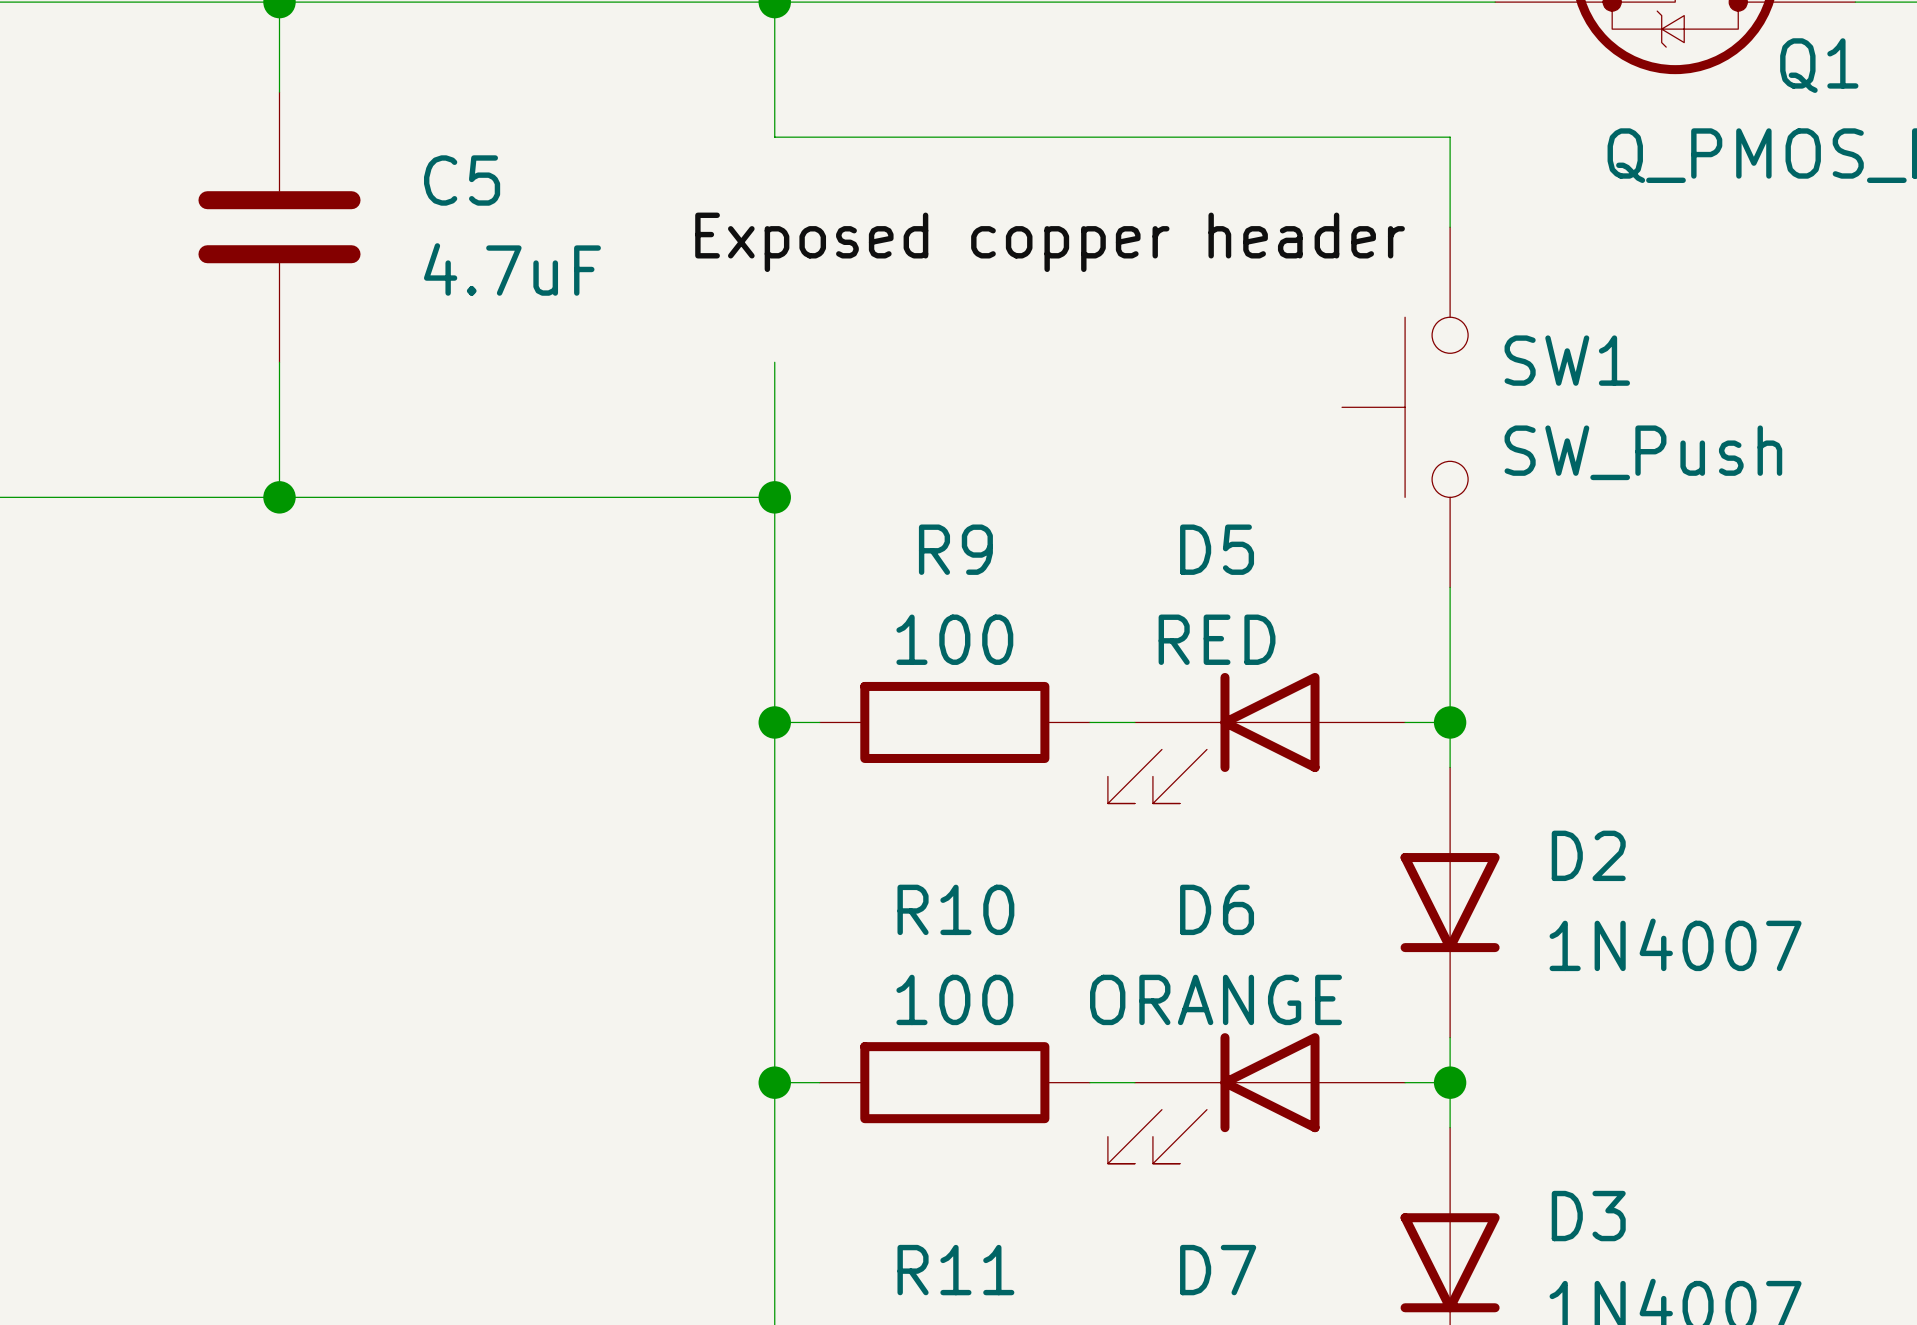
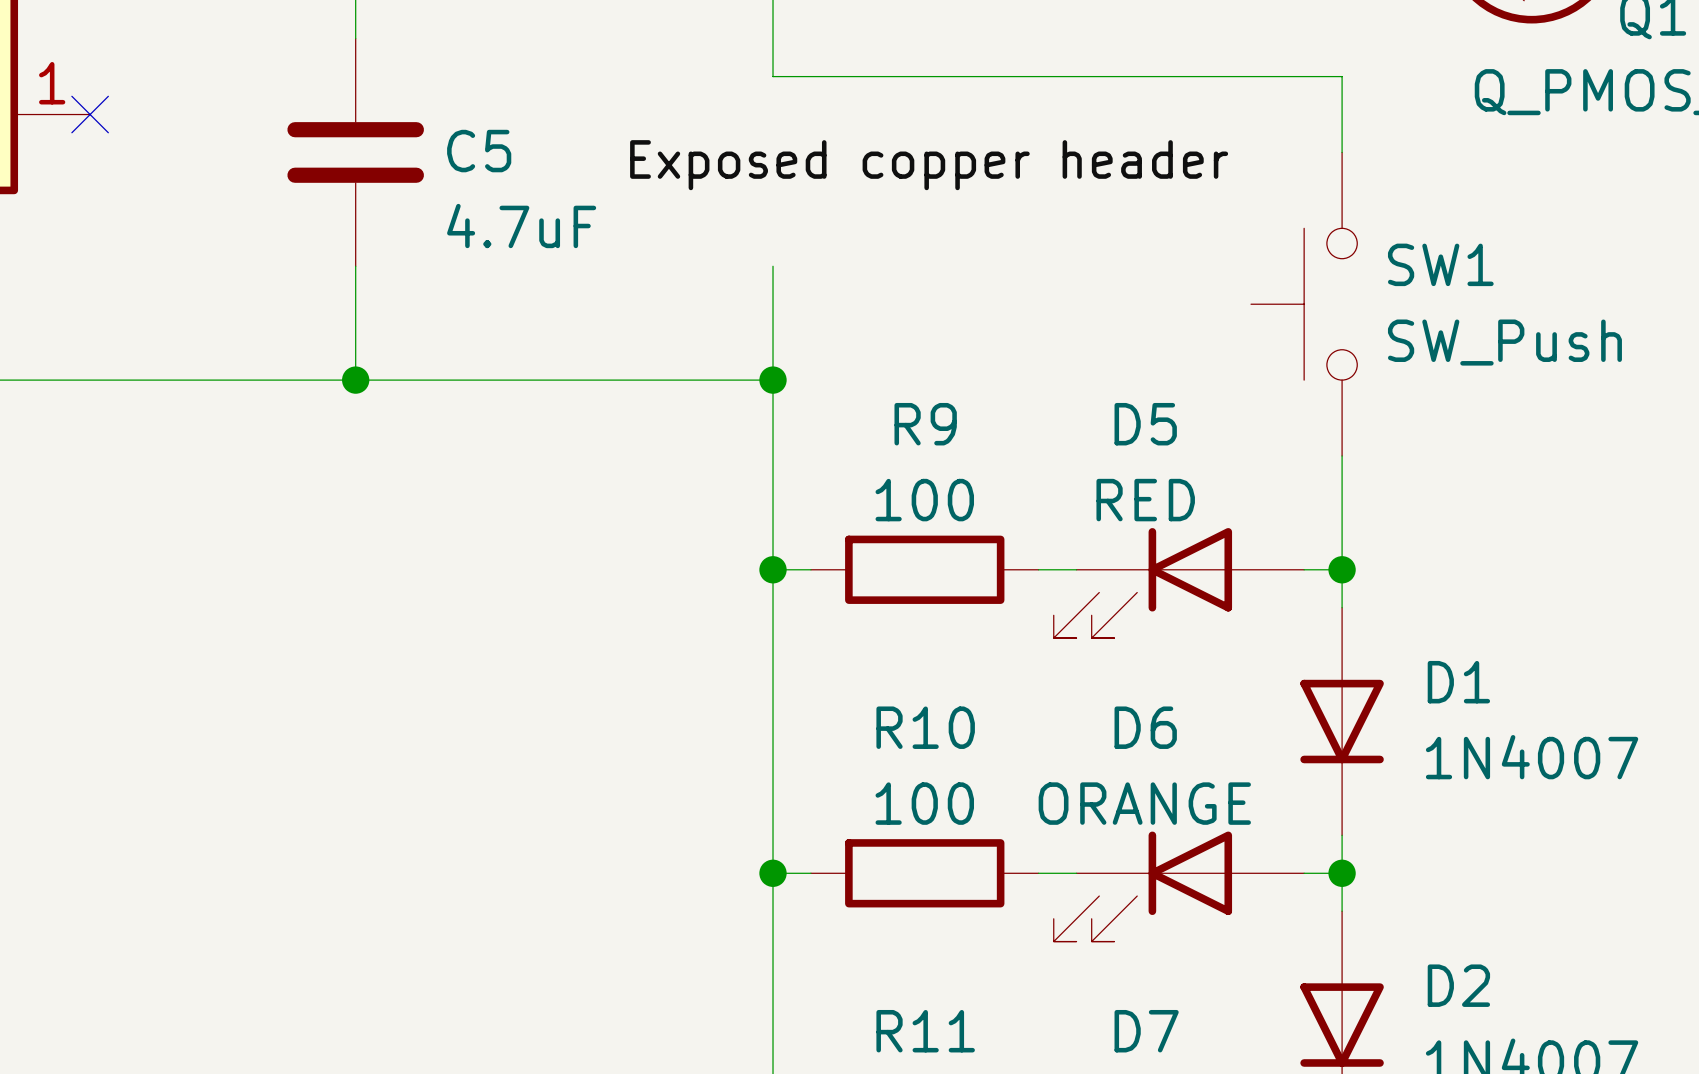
C5 name position: C5 (462, 180) -> C5 (479, 151)
label position: Exposed copper header (1050, 242) -> Exposed copper header (929, 165)
C5 value position: 4.7uF (512, 269) -> 4.7uF (521, 226)
D2 name: D2 (1588, 855) -> D1 (1458, 682)
D3 name: D3 (1588, 1216) -> D2 (1458, 985)

